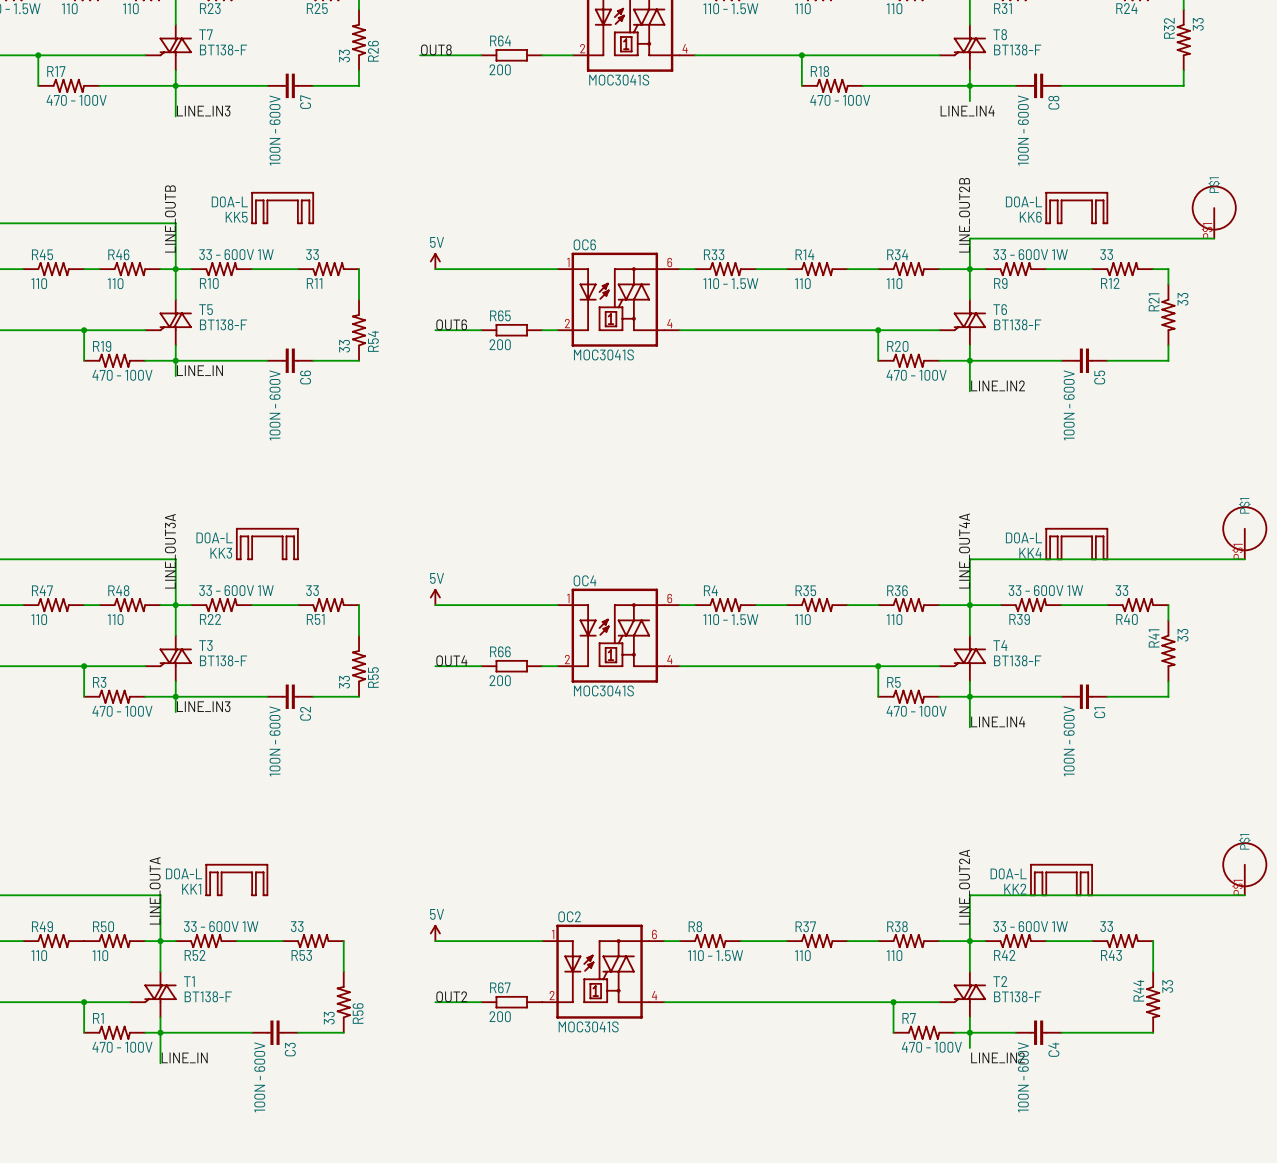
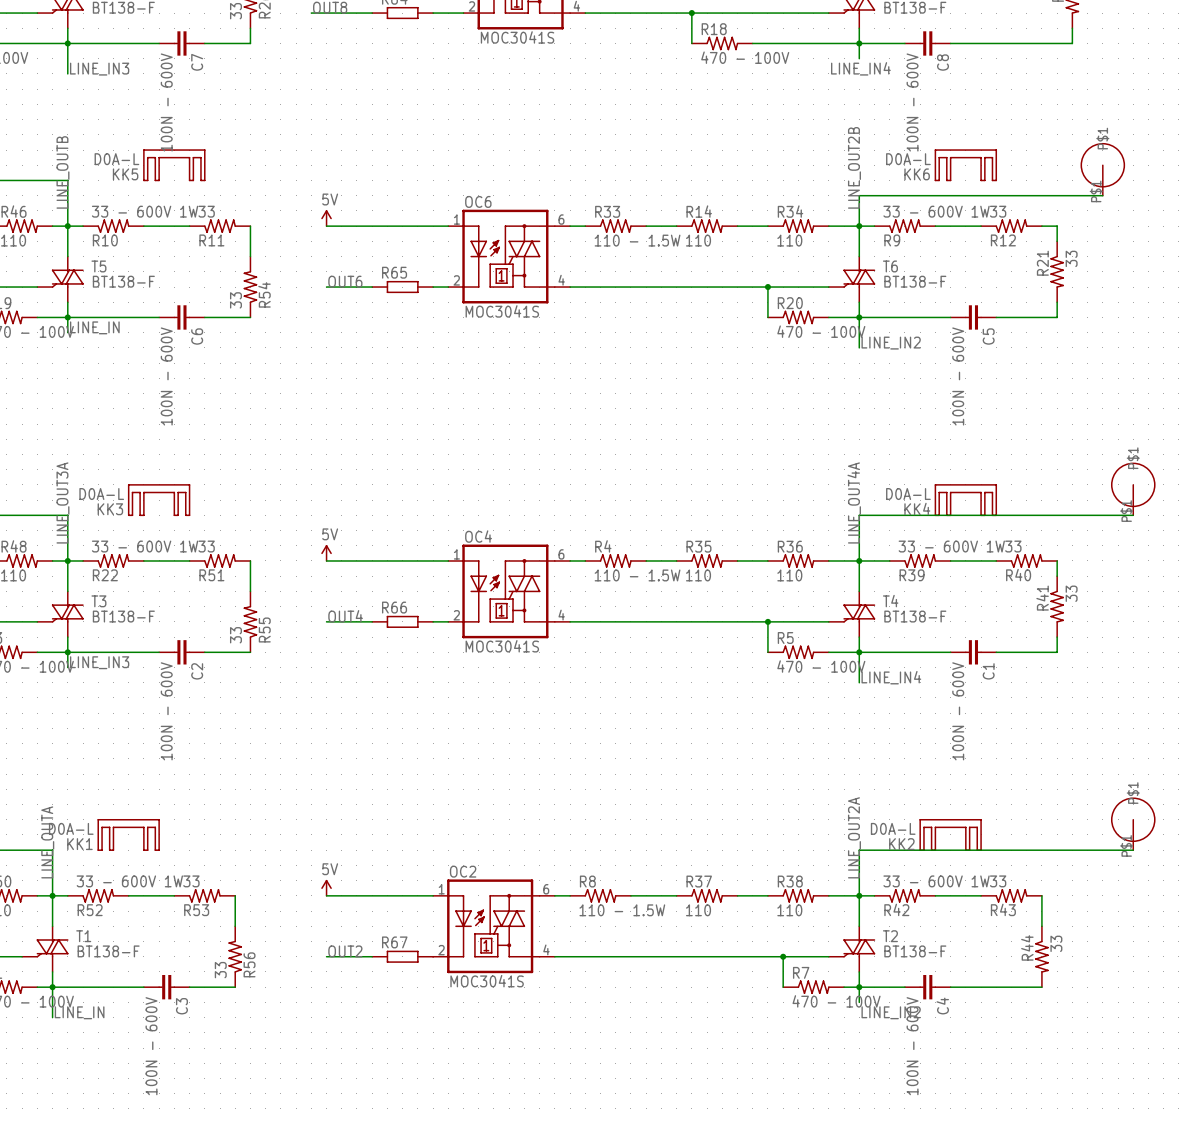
R64 value: 200 (500, 69) -> none
R65 value: 200 (500, 344) -> none
R66 value: 200 (500, 680) -> none
R67 value: 200 (500, 1016) -> none

